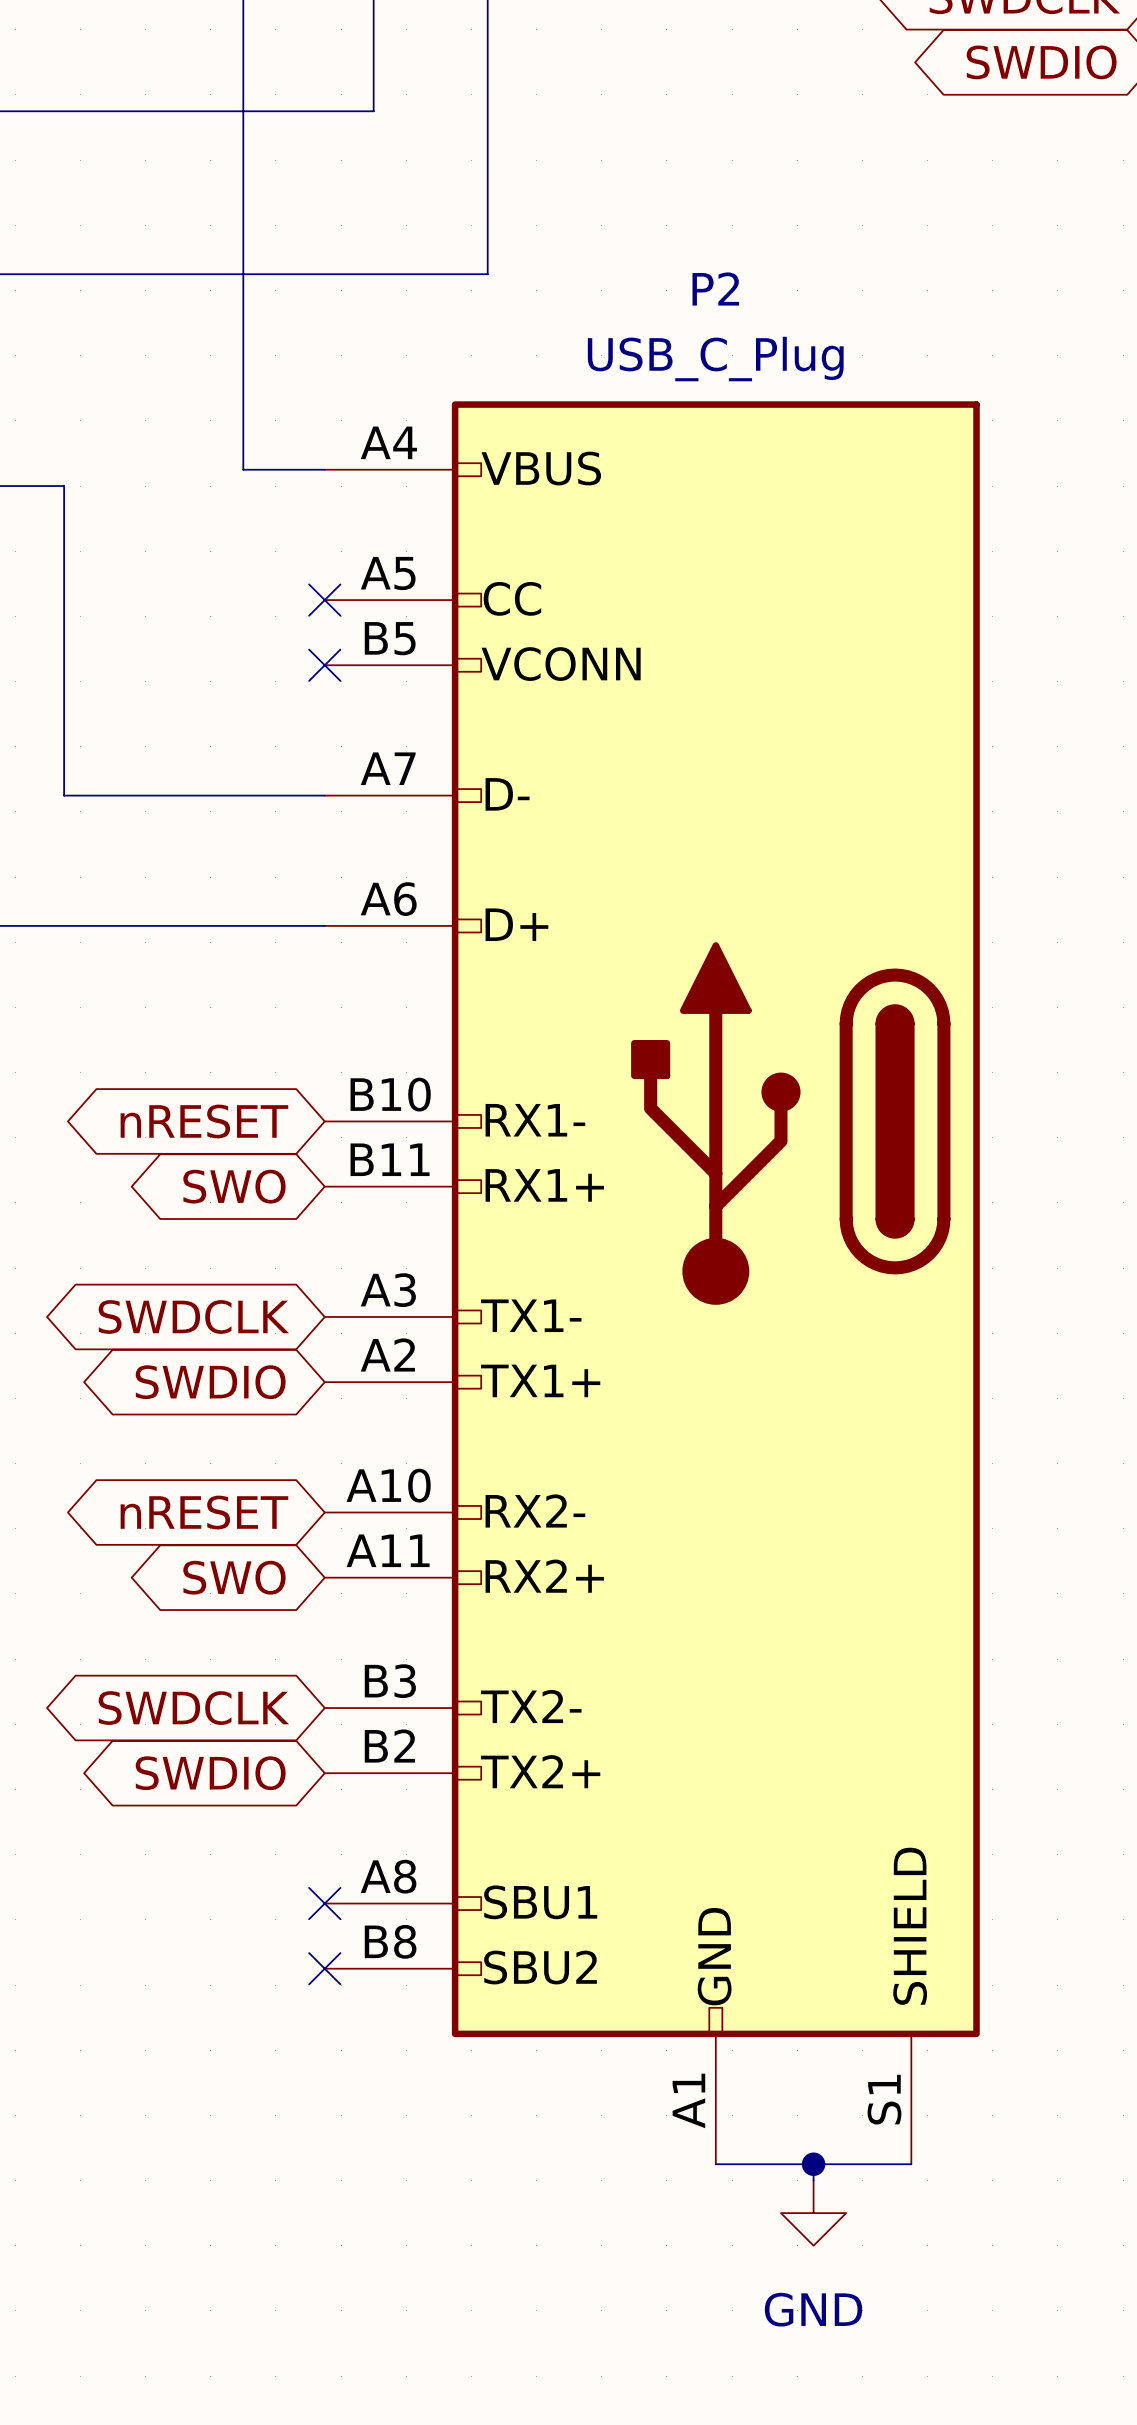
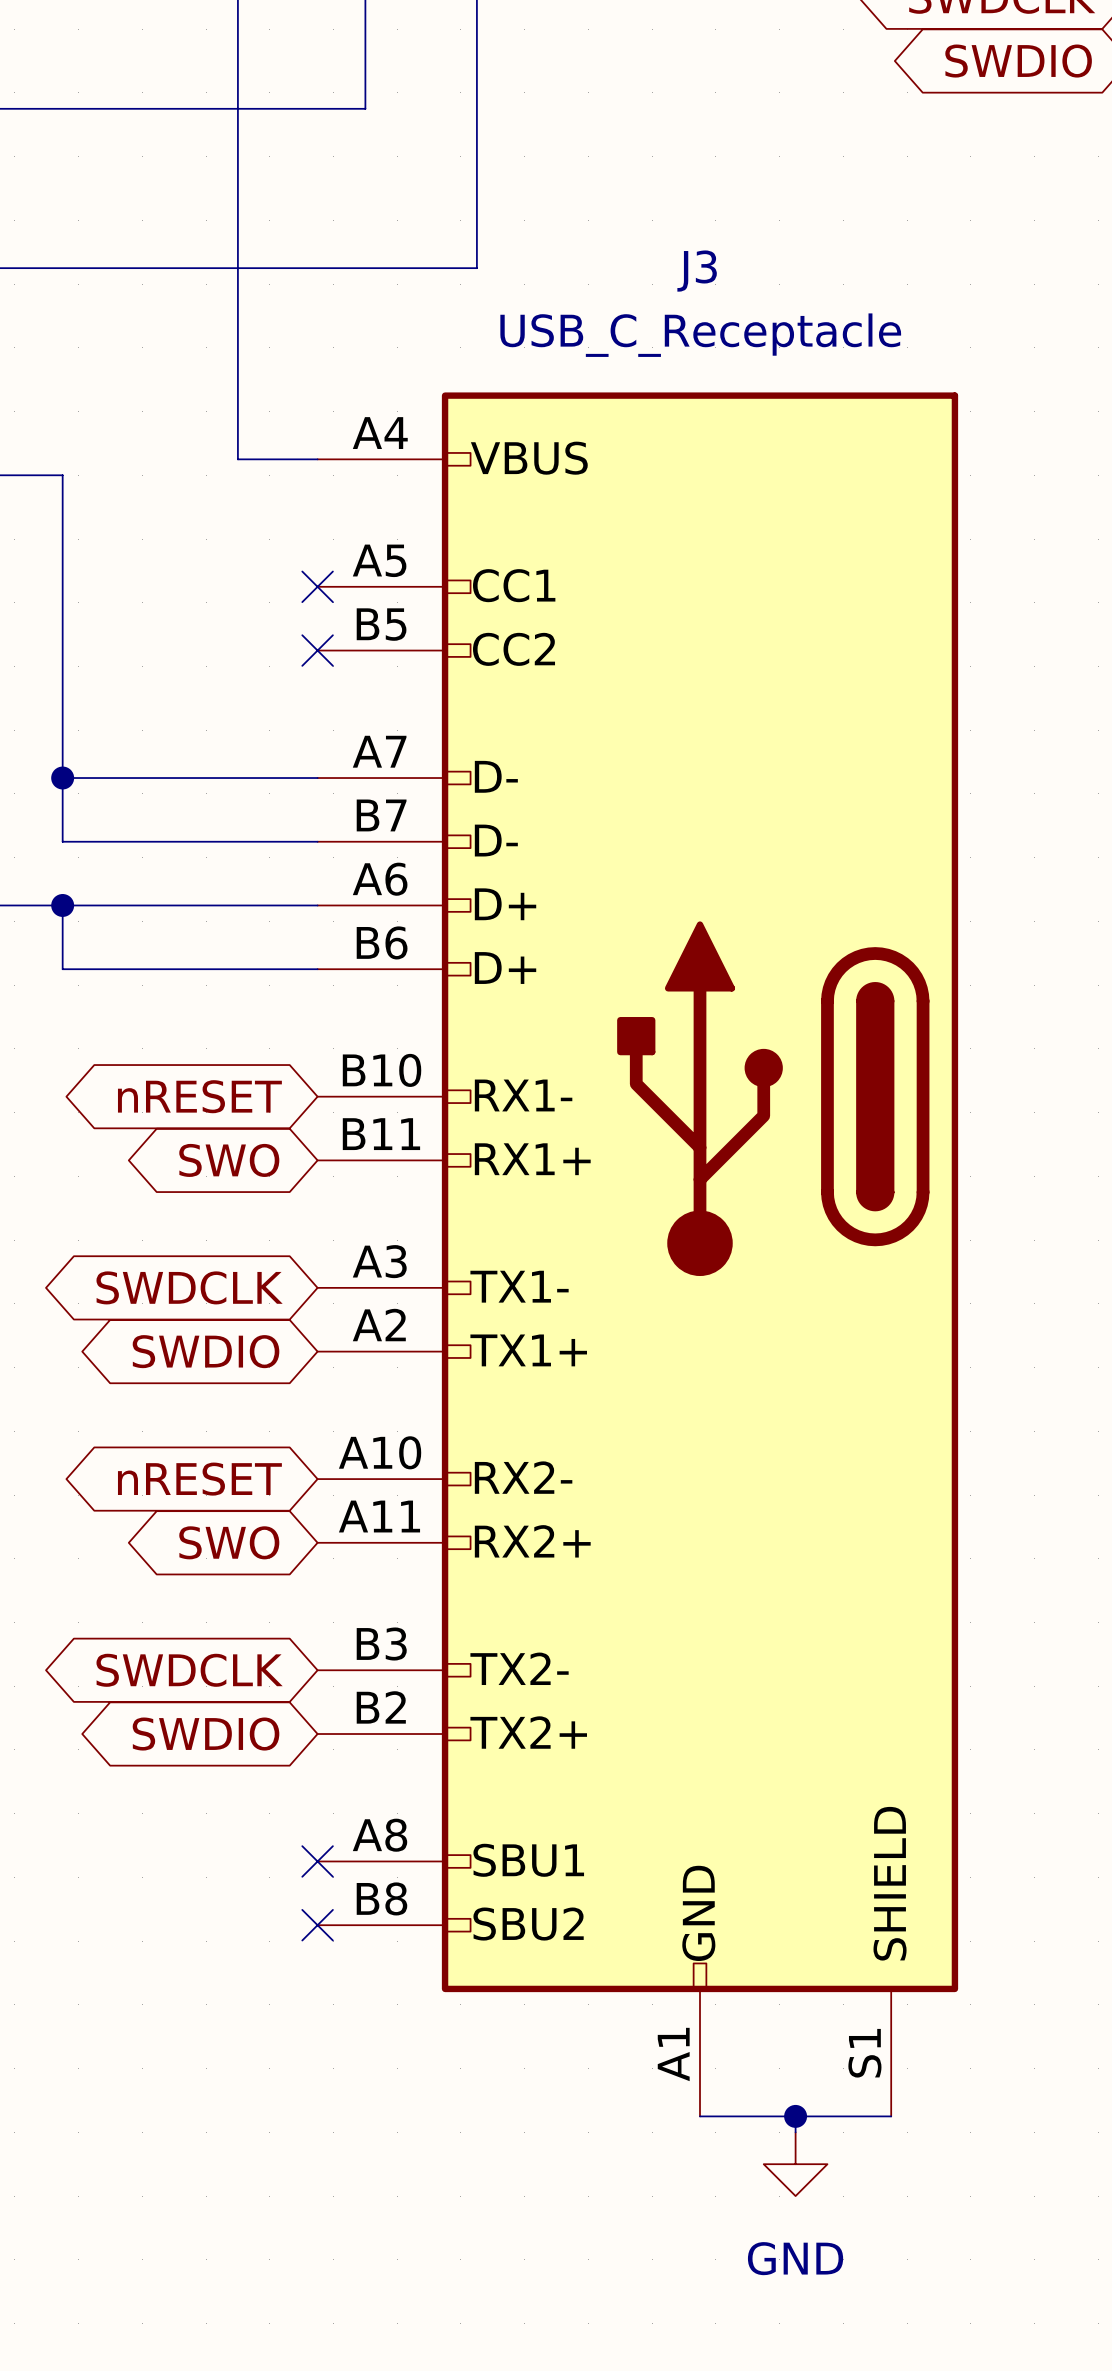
wire: none -> (62, 778) (62, 841) (317, 841)
junction: none -> (62, 778)
wire: none -> (62, 905) (62, 969) (317, 969)
junction: none -> (62, 905)
P2: USB_C_Plug (652, 1282) -> none
J3: none -> USB_C_Receptacle (637, 1254)

